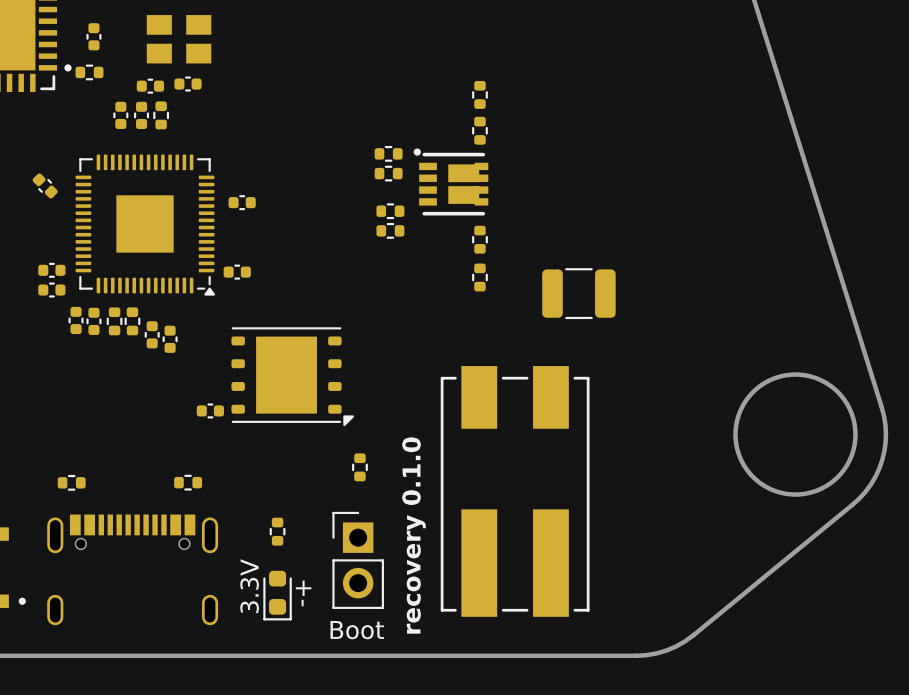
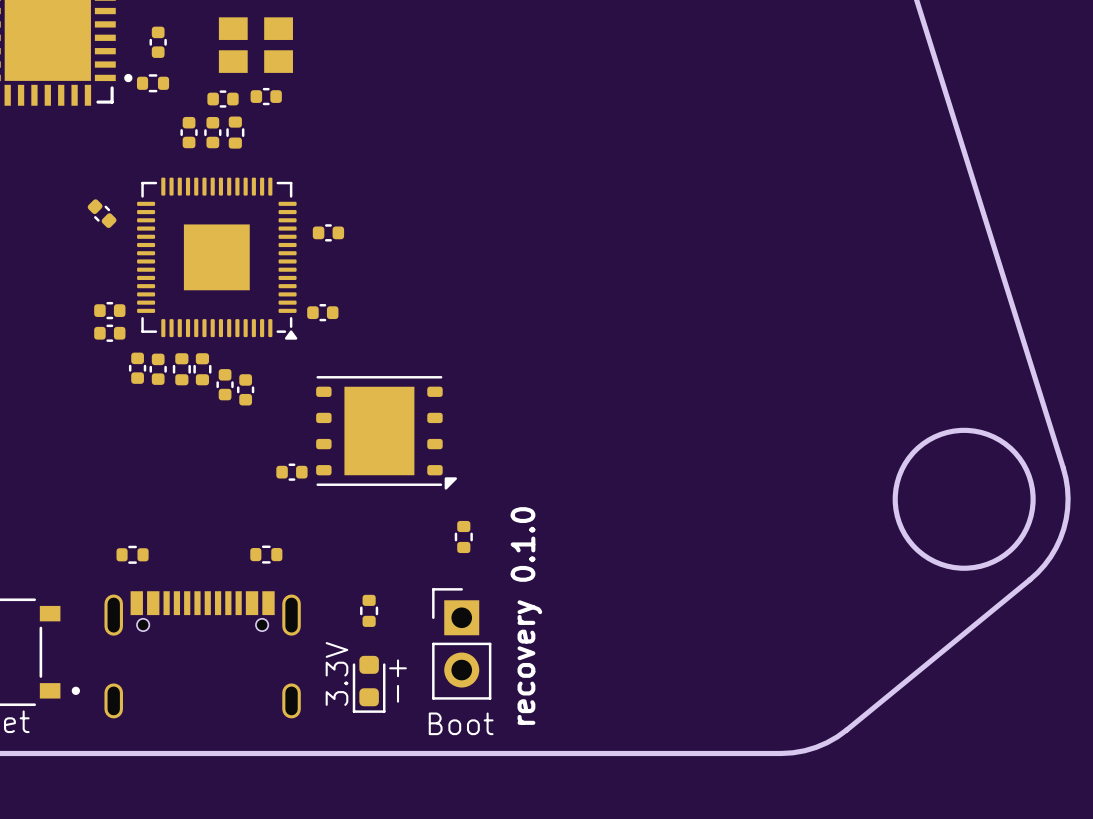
part: (479, 94) -> none
part: (479, 130) -> none
drawing: [413, 148, 421, 156] -> none
part: (388, 153) -> none
part: (388, 173) -> none
part: (453, 184) -> none
part: (390, 211) -> none
part: (390, 230) -> none
part: (479, 239) -> none
part: (479, 277) -> none
part: (578, 293) -> none
part: (515, 491) -> none

